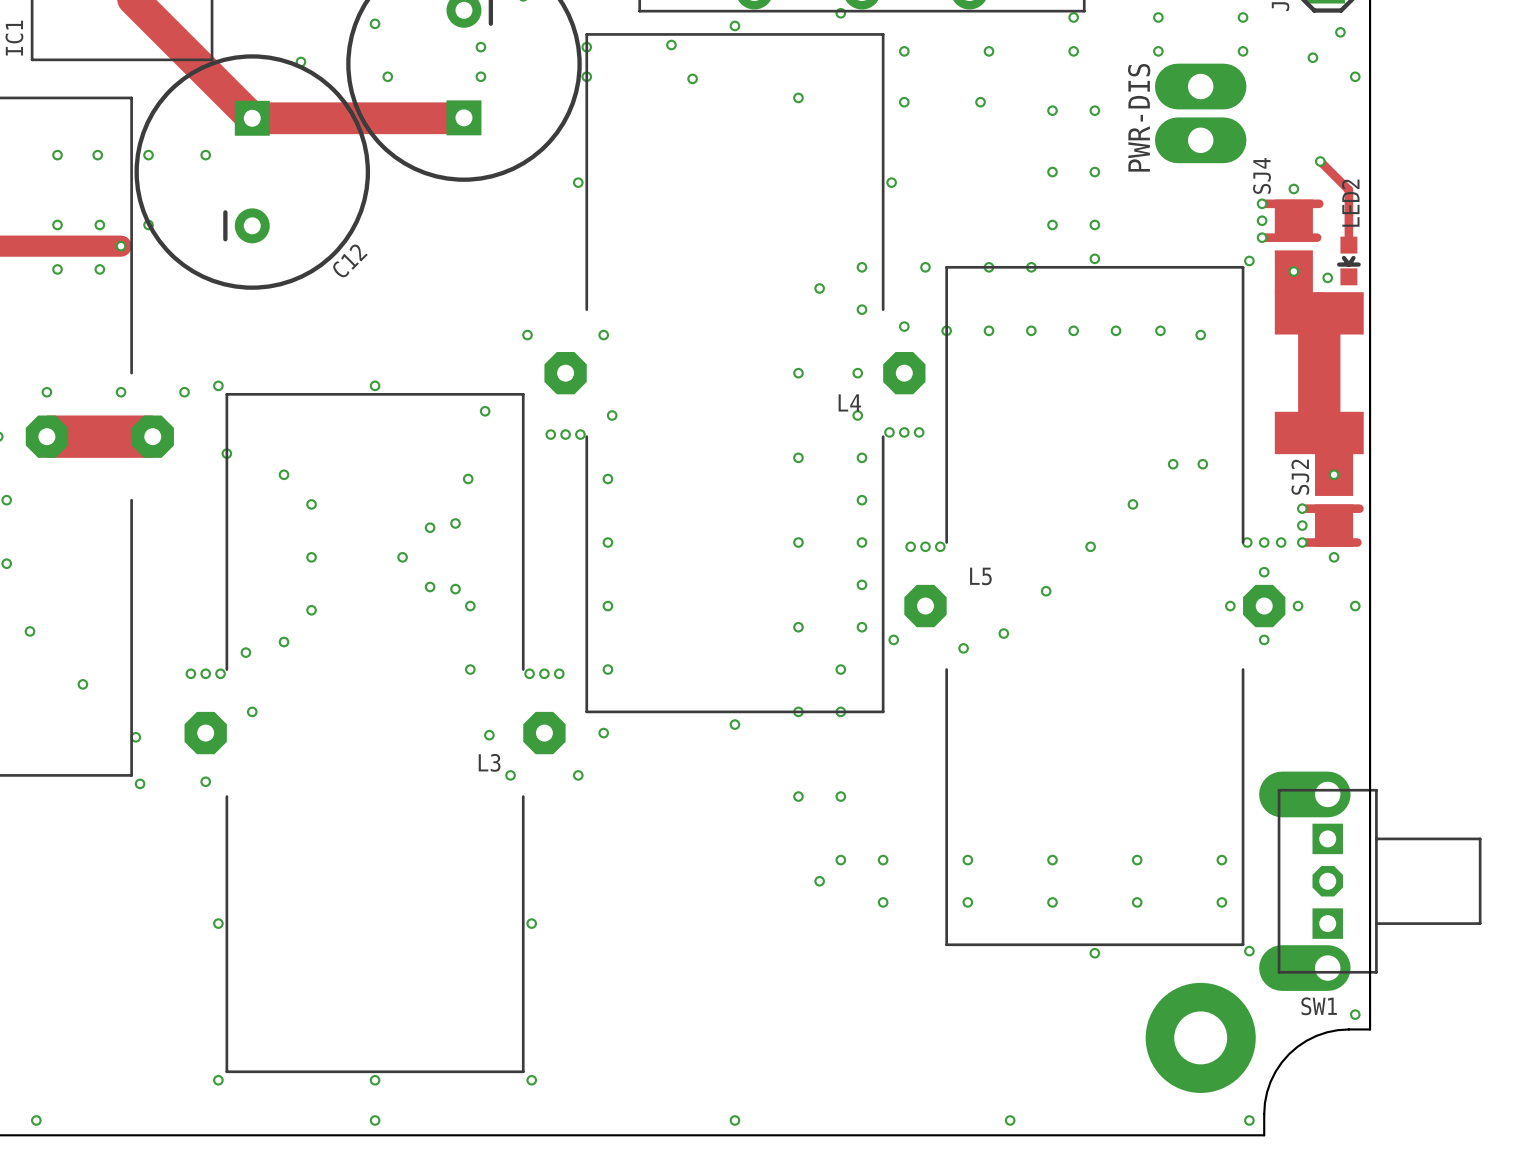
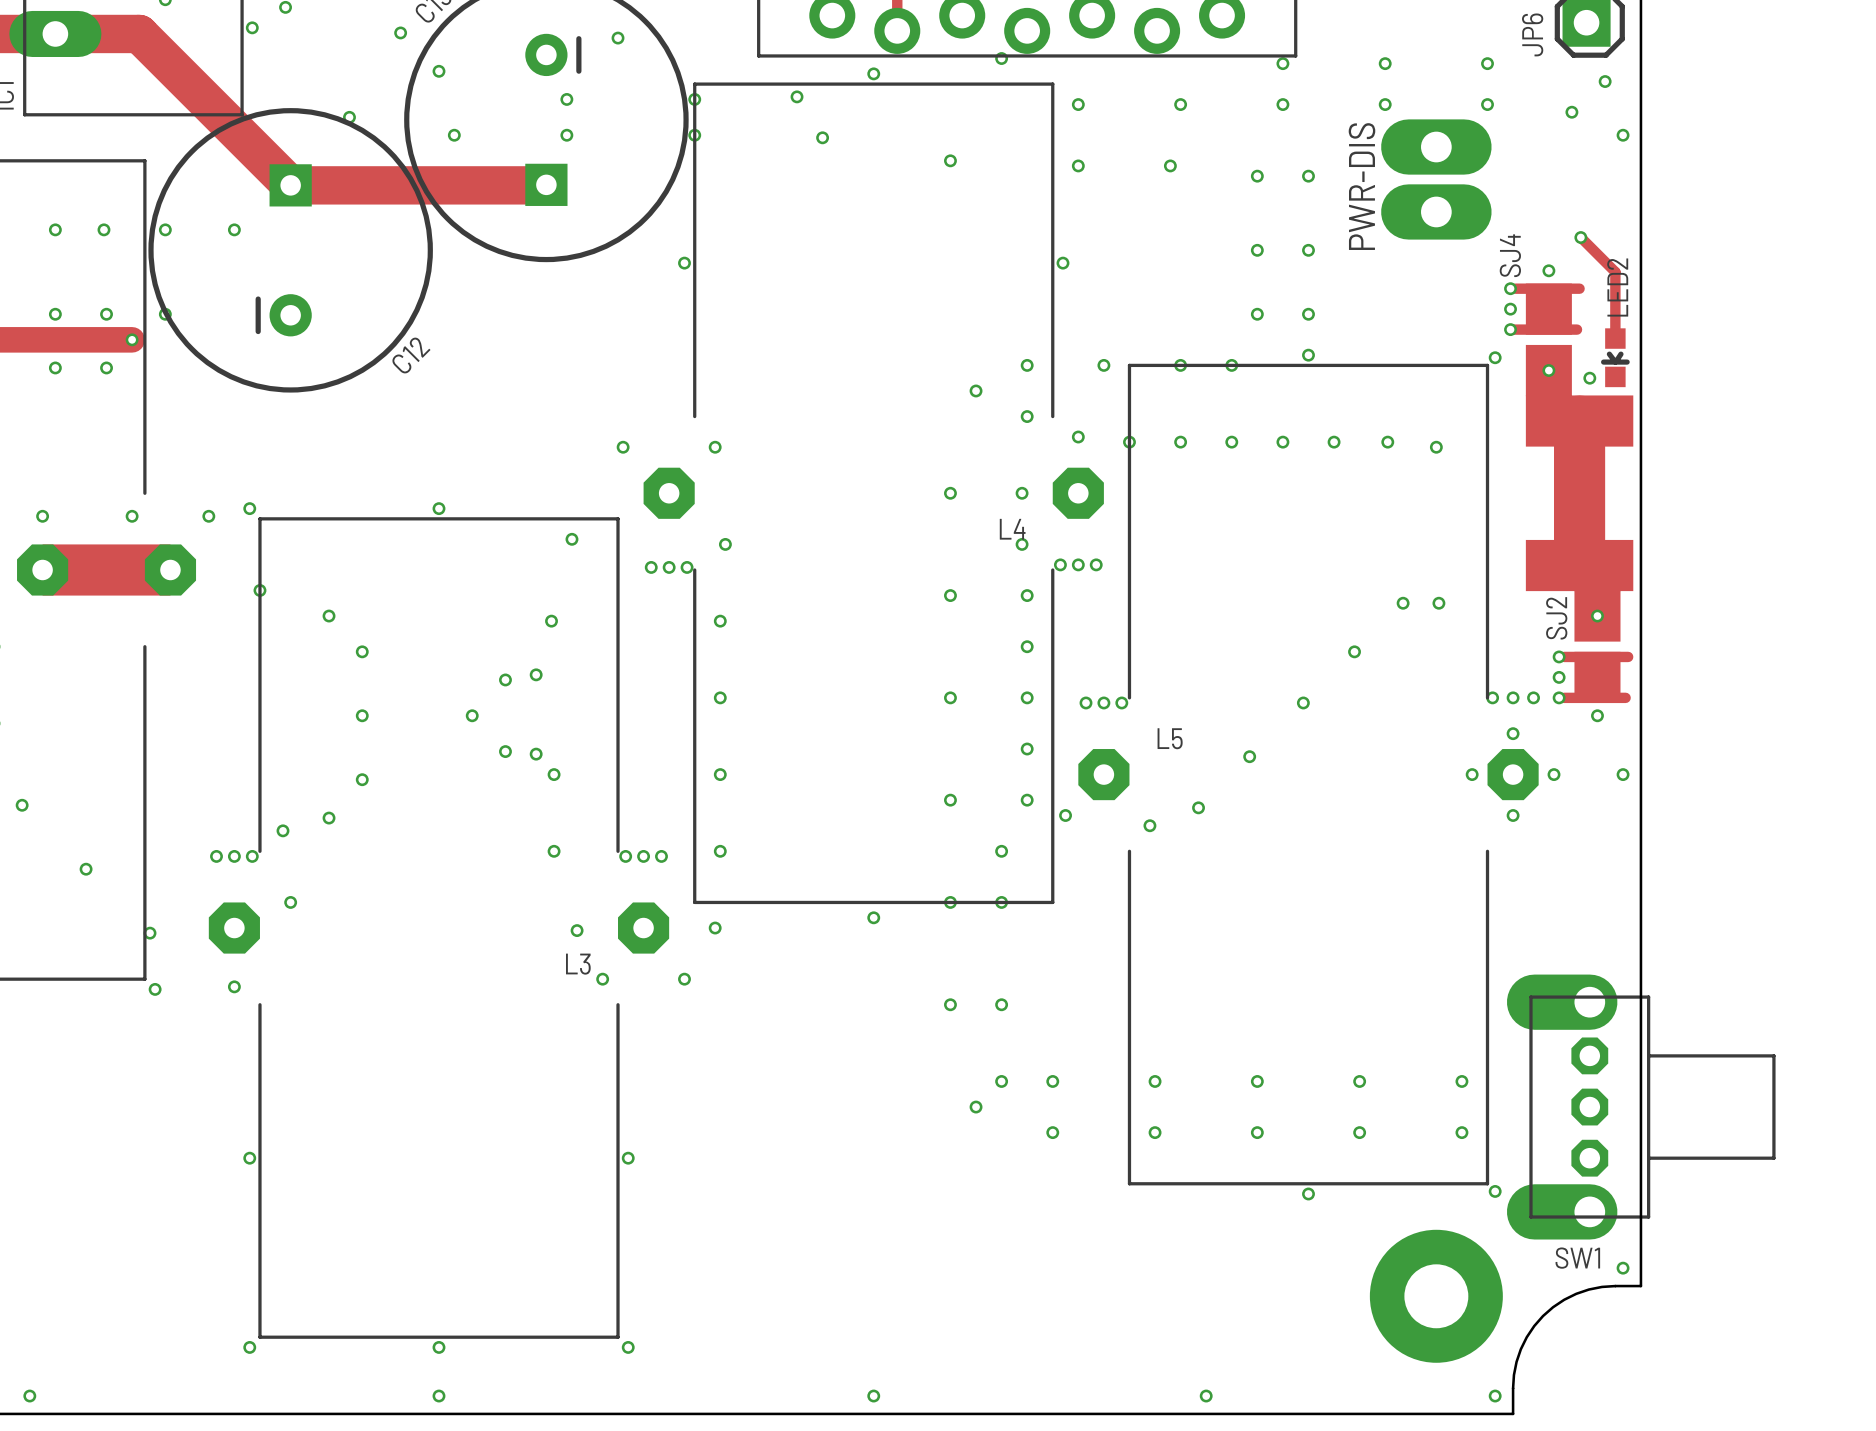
SW1 footprint: [1259, 771, 1482, 991] -> [1506, 974, 1776, 1240]

